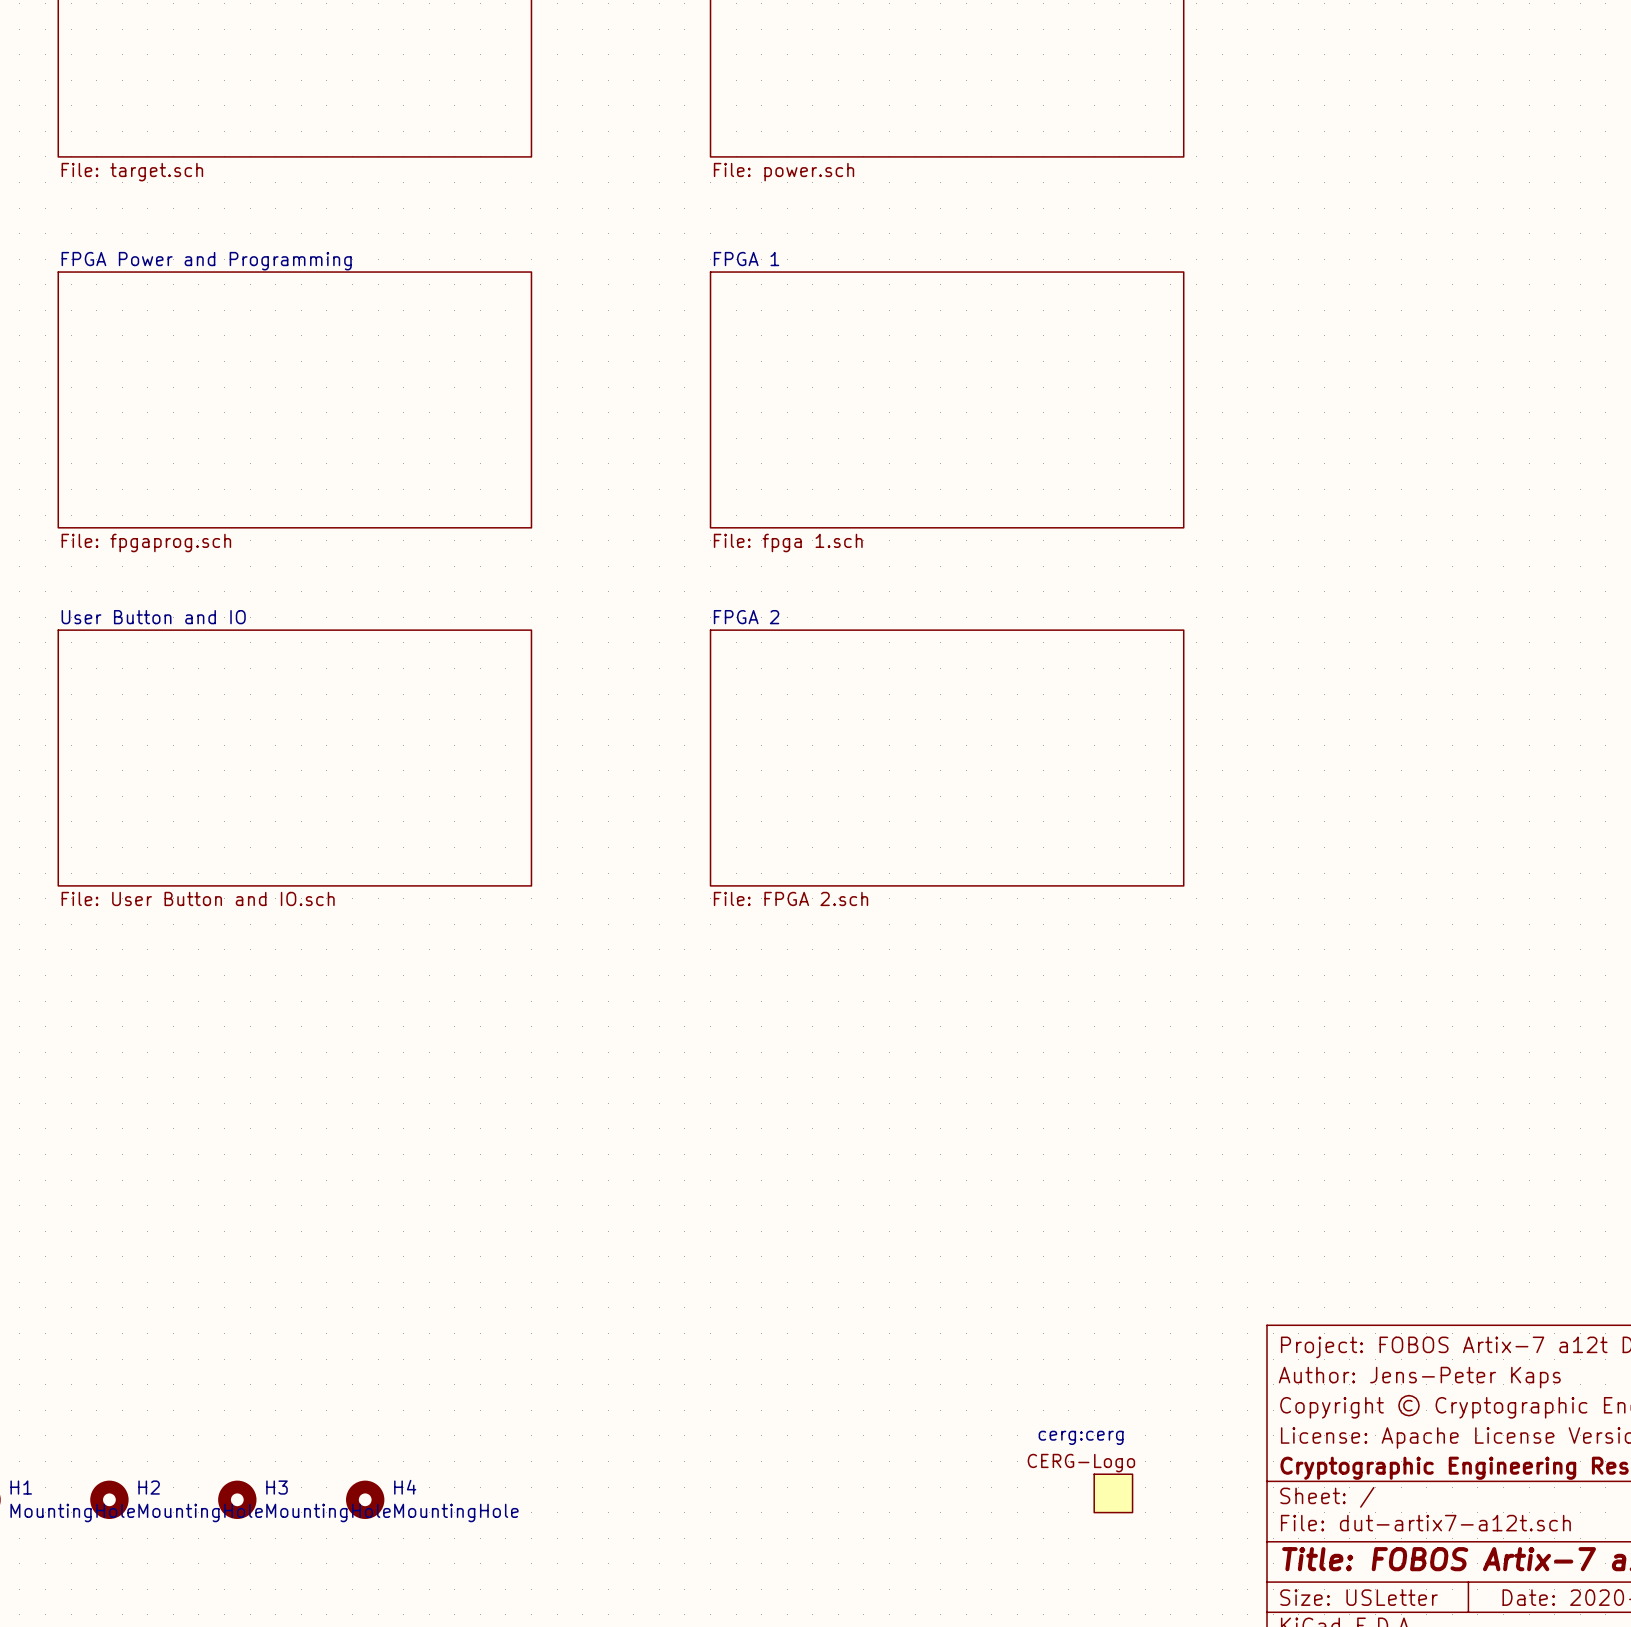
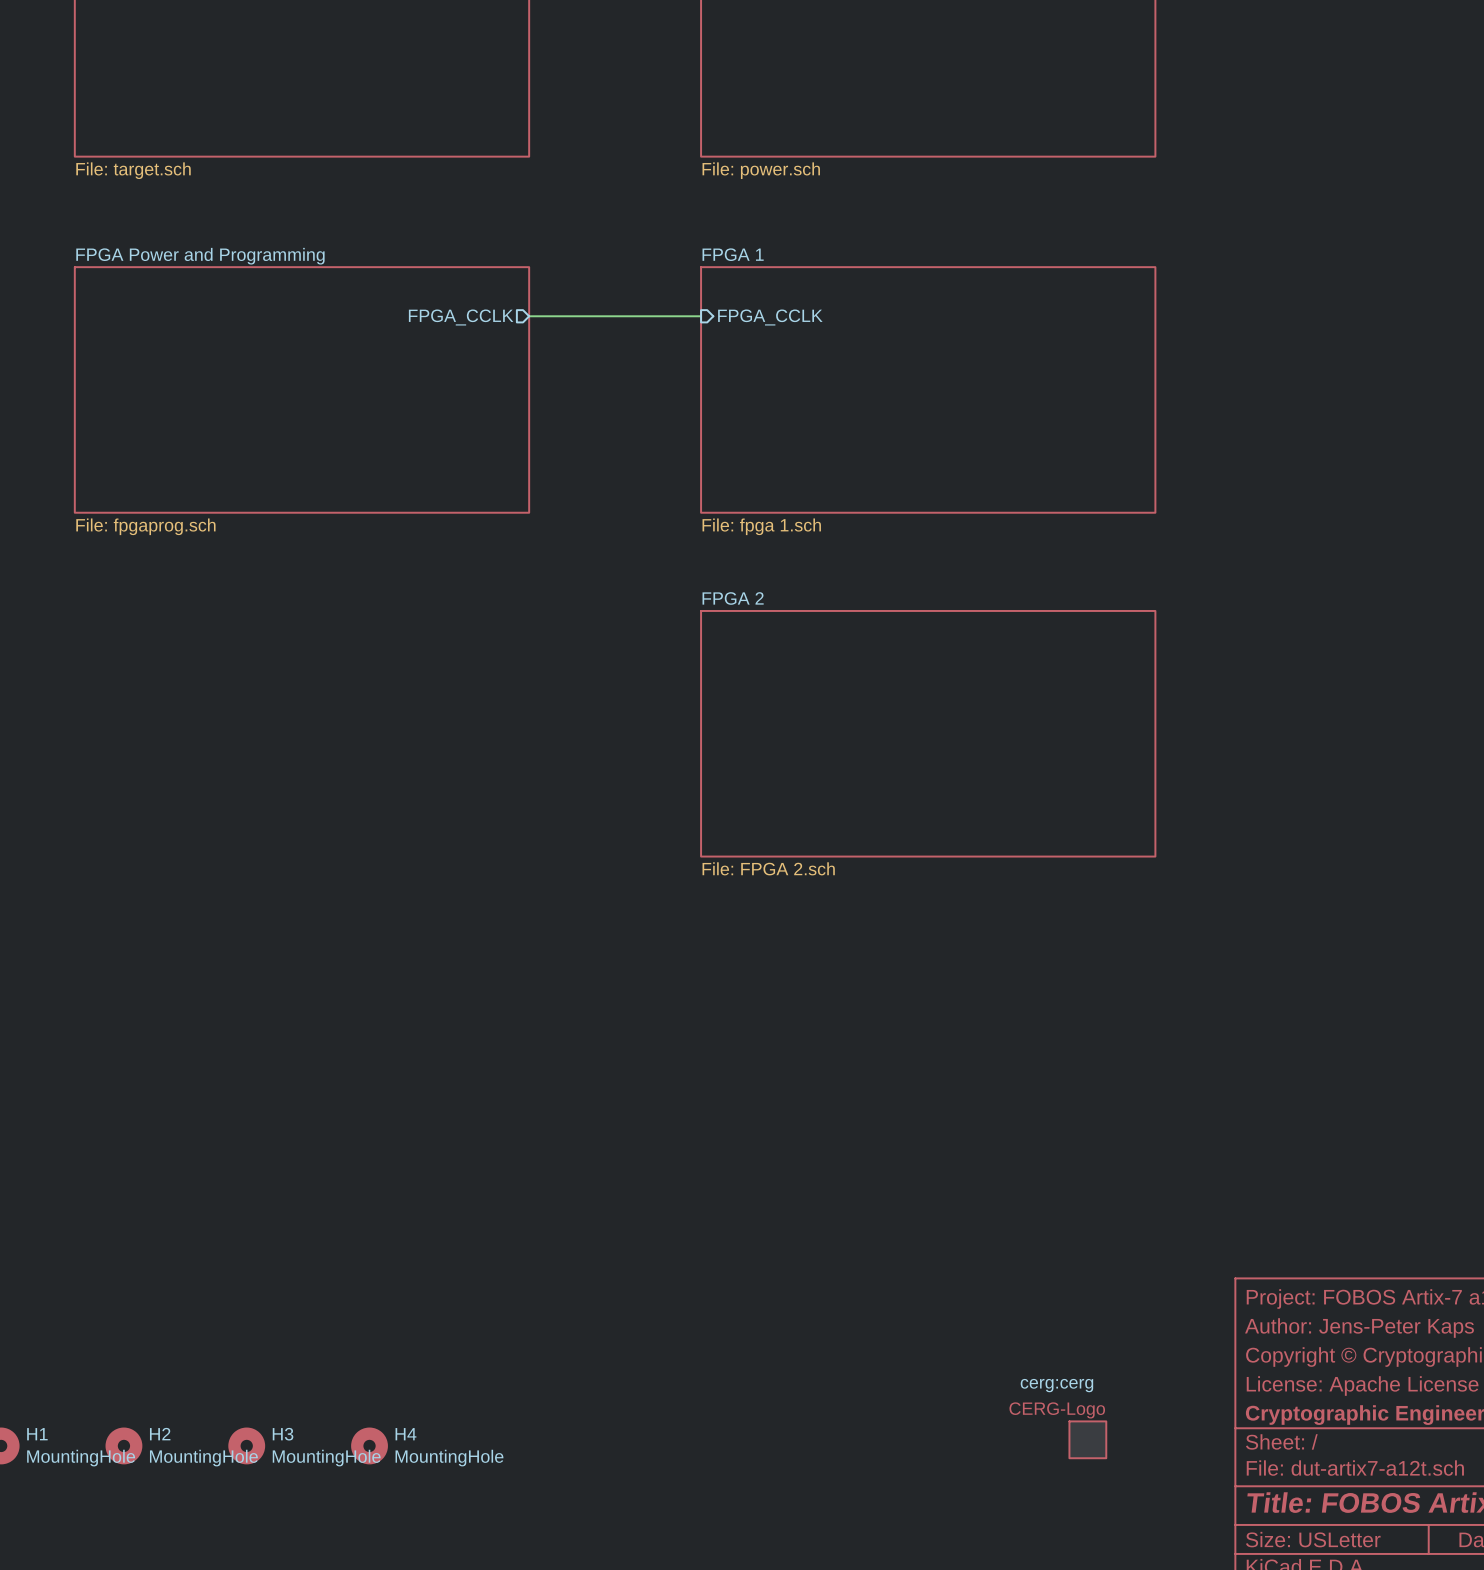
sheet pin: none -> FPGA_CCLK (461, 317)
wire: none -> (529, 316) (701, 316)
sheet pin: none -> FPGA_CCLK (770, 317)
sheet User Button and IO: File: User Button and IO.sch (294, 758) -> none

